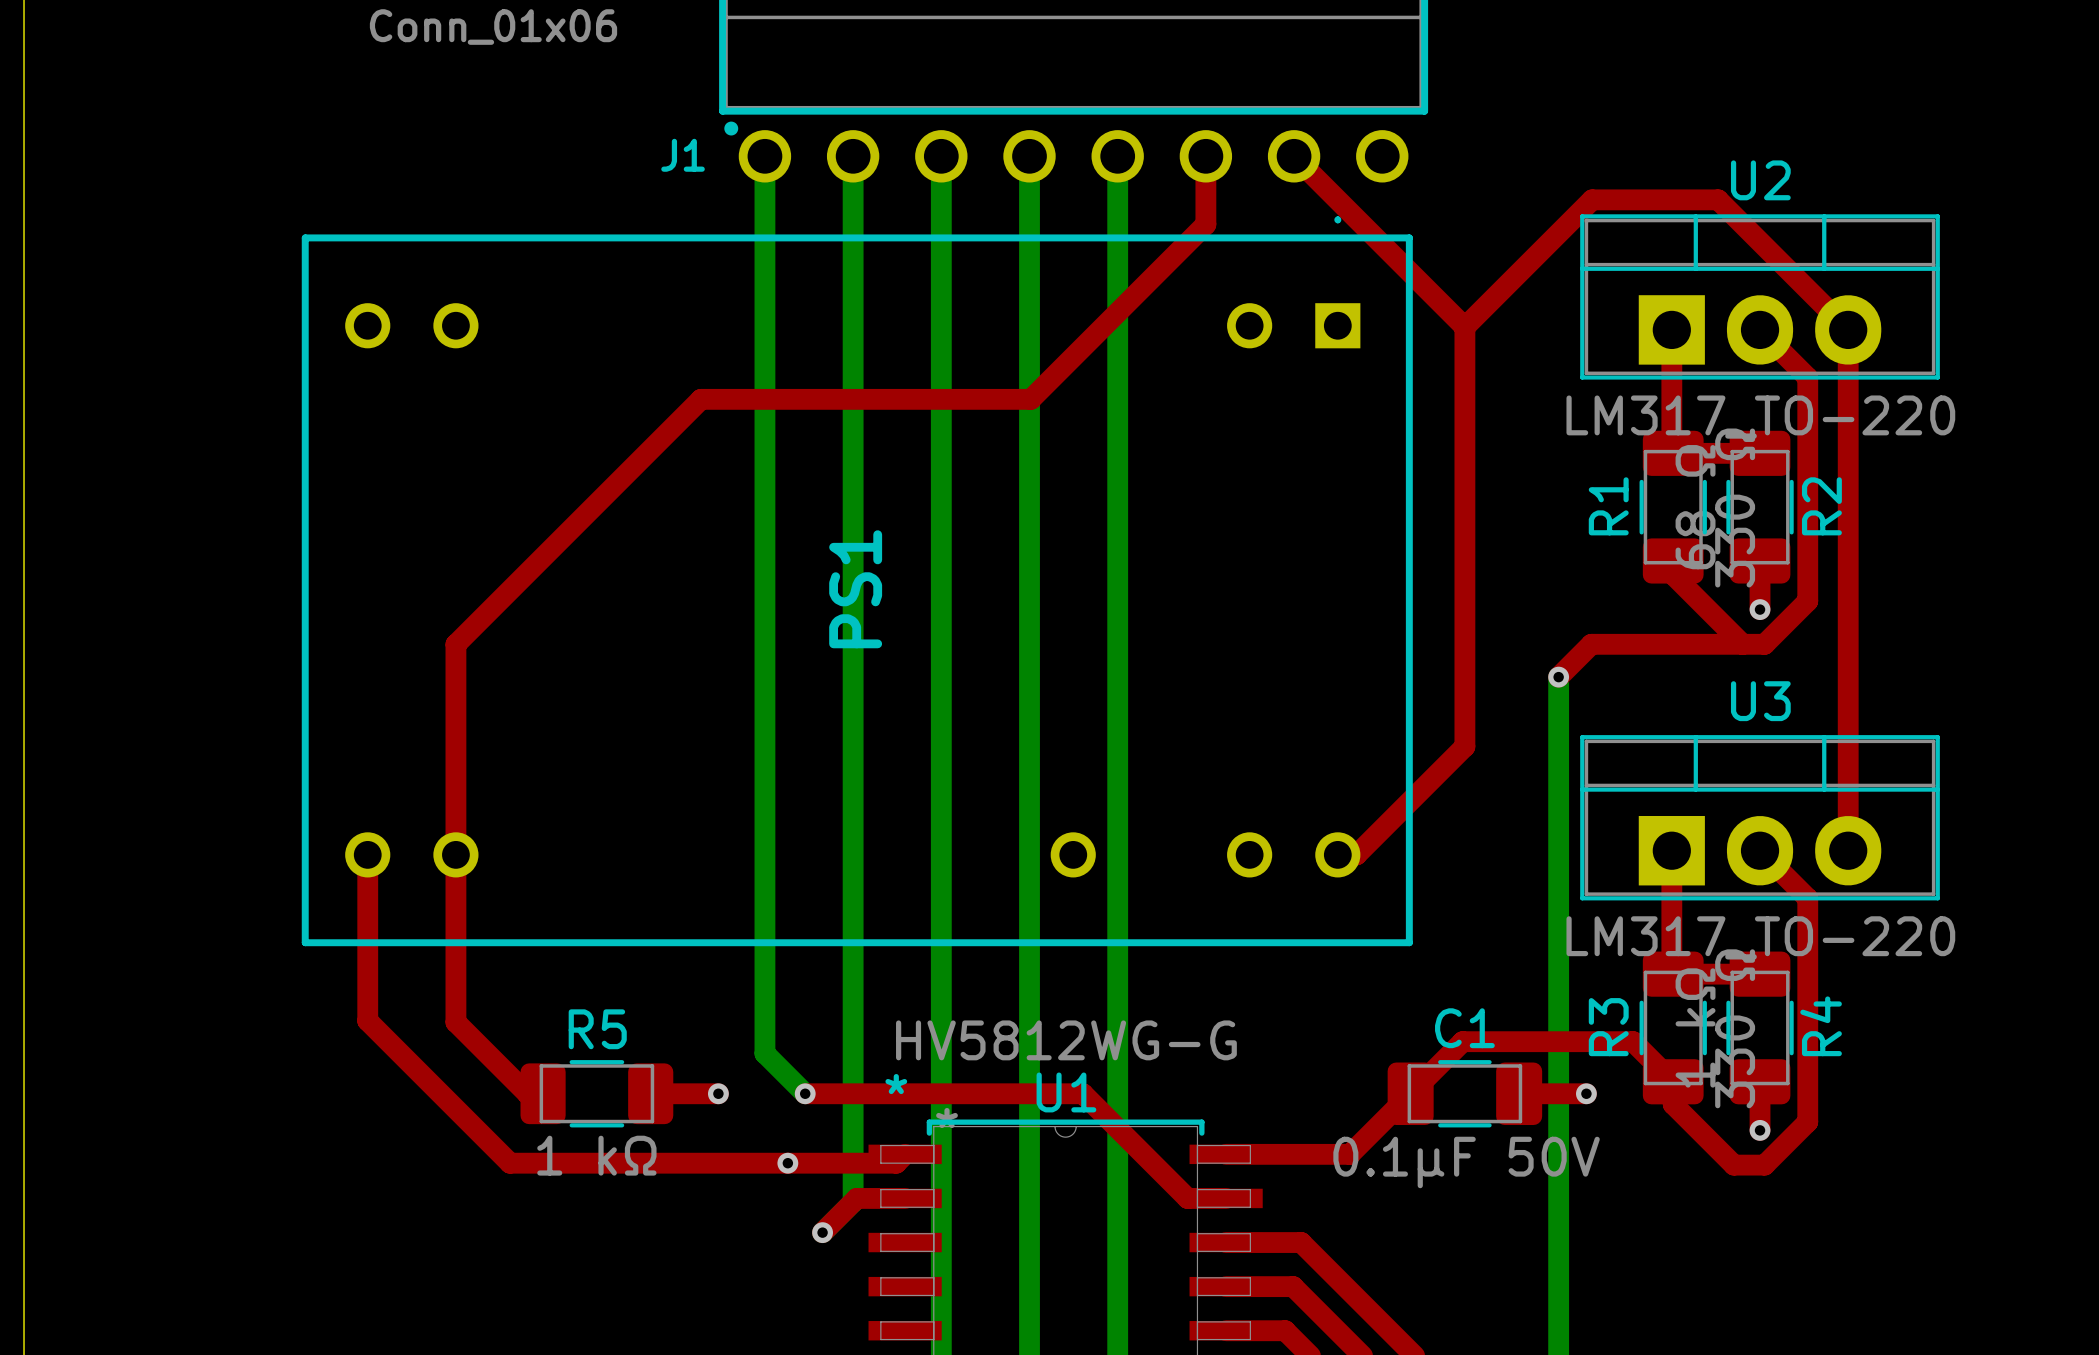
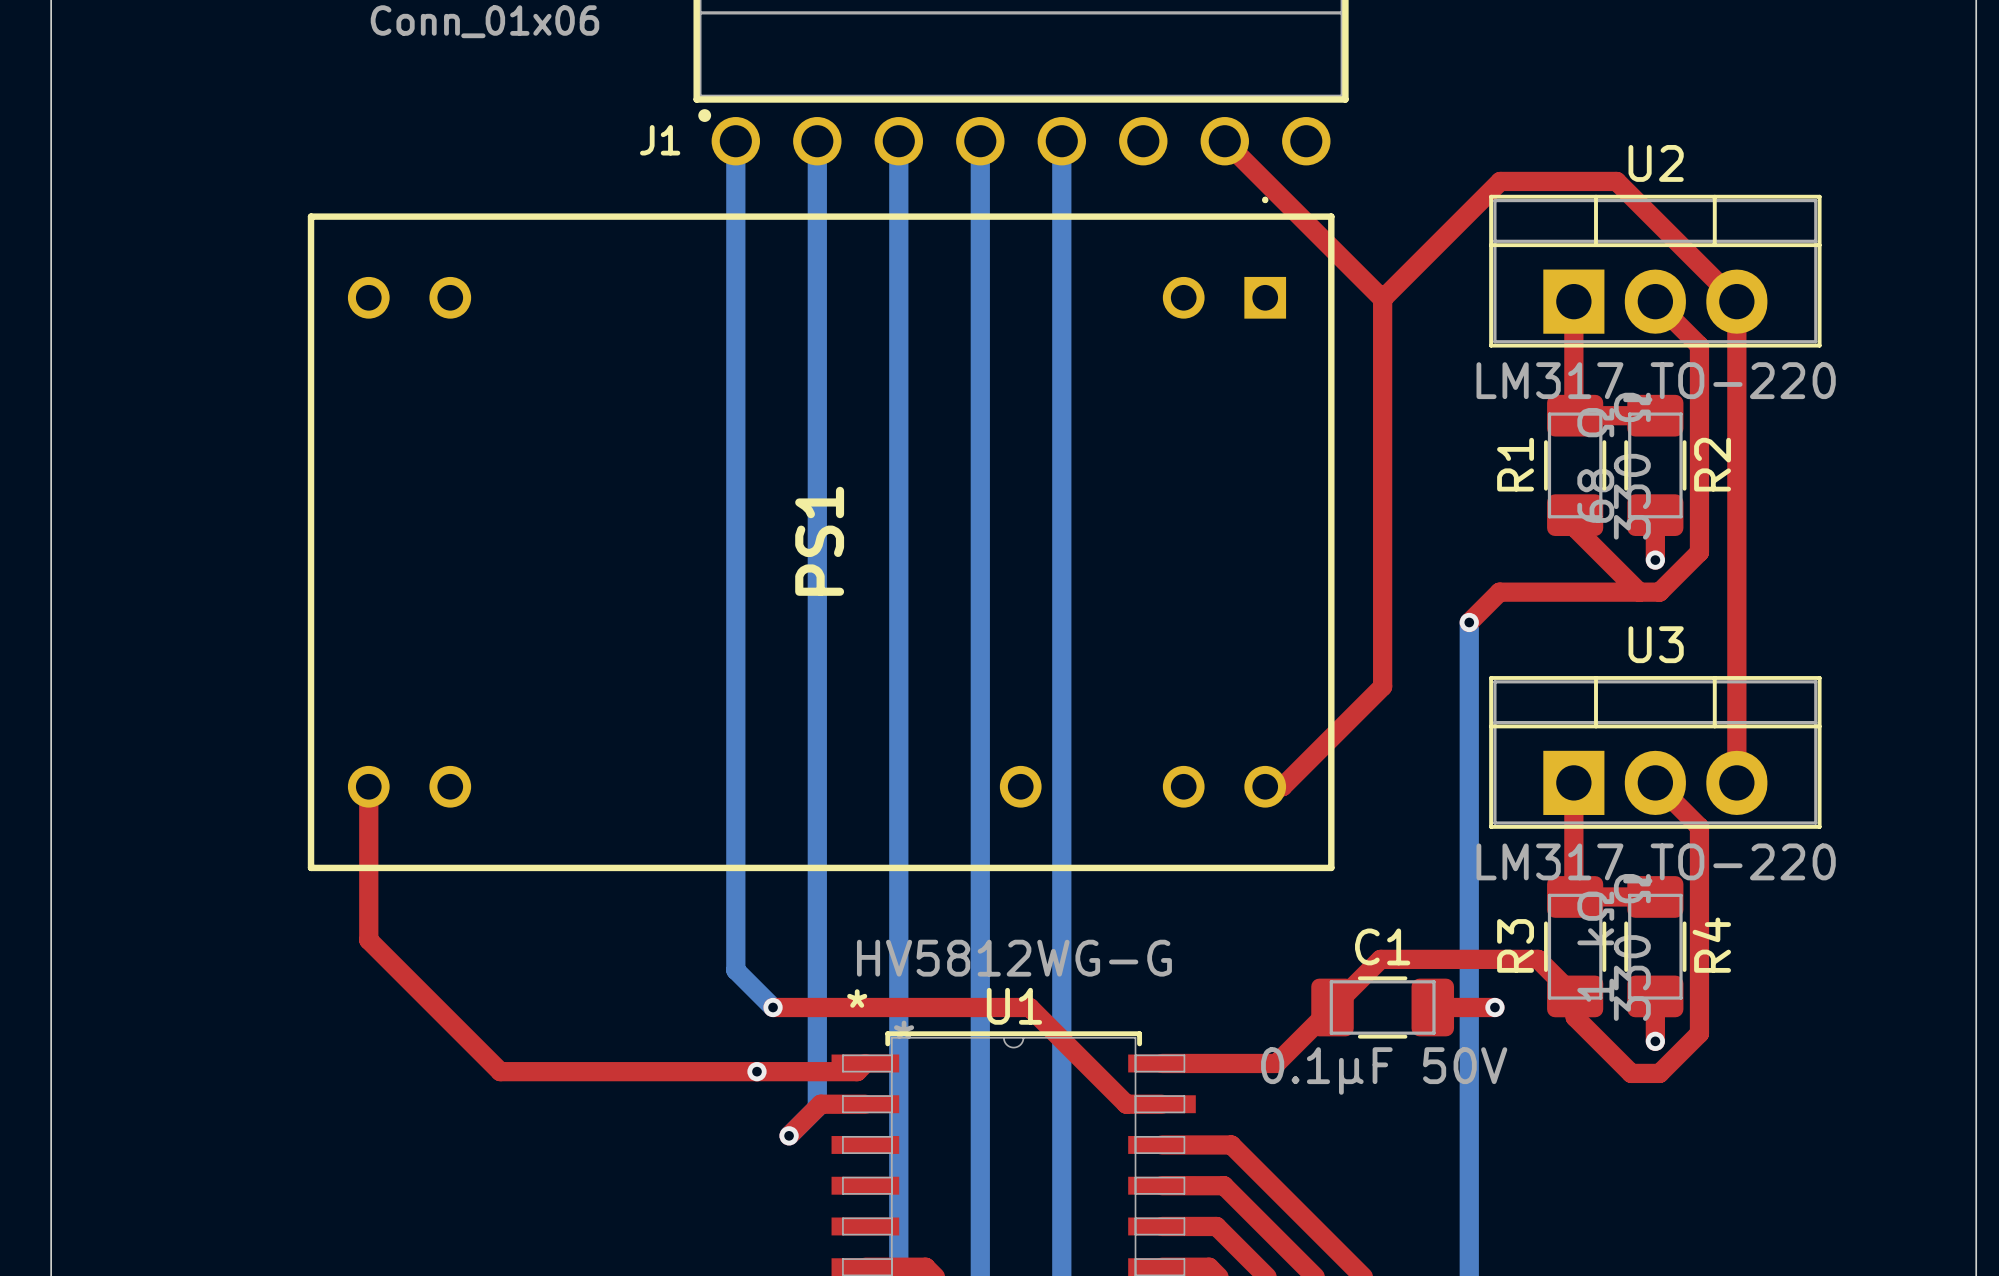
top track: (1205, 156) (1205, 224) (1030, 399) (701, 399) (455, 644) (455, 1022) (527, 1093) (543, 1093) -> none
R5: 1 kΩ (596, 1093) -> none
top track: (668, 1093) (718, 1093) -> none
via: (718, 1093) -> none

